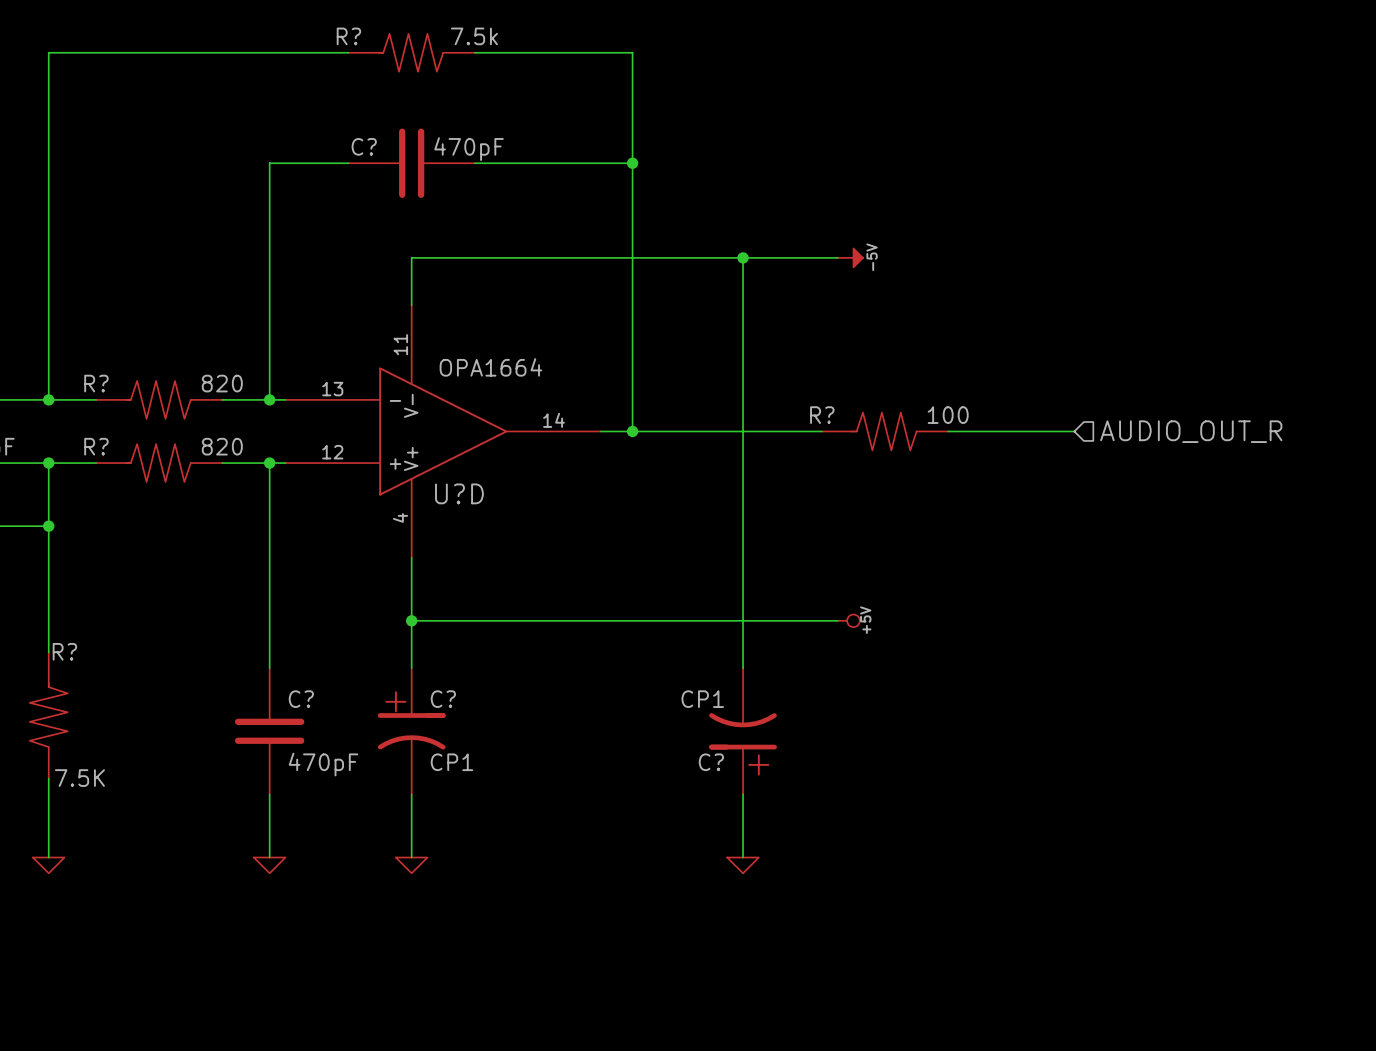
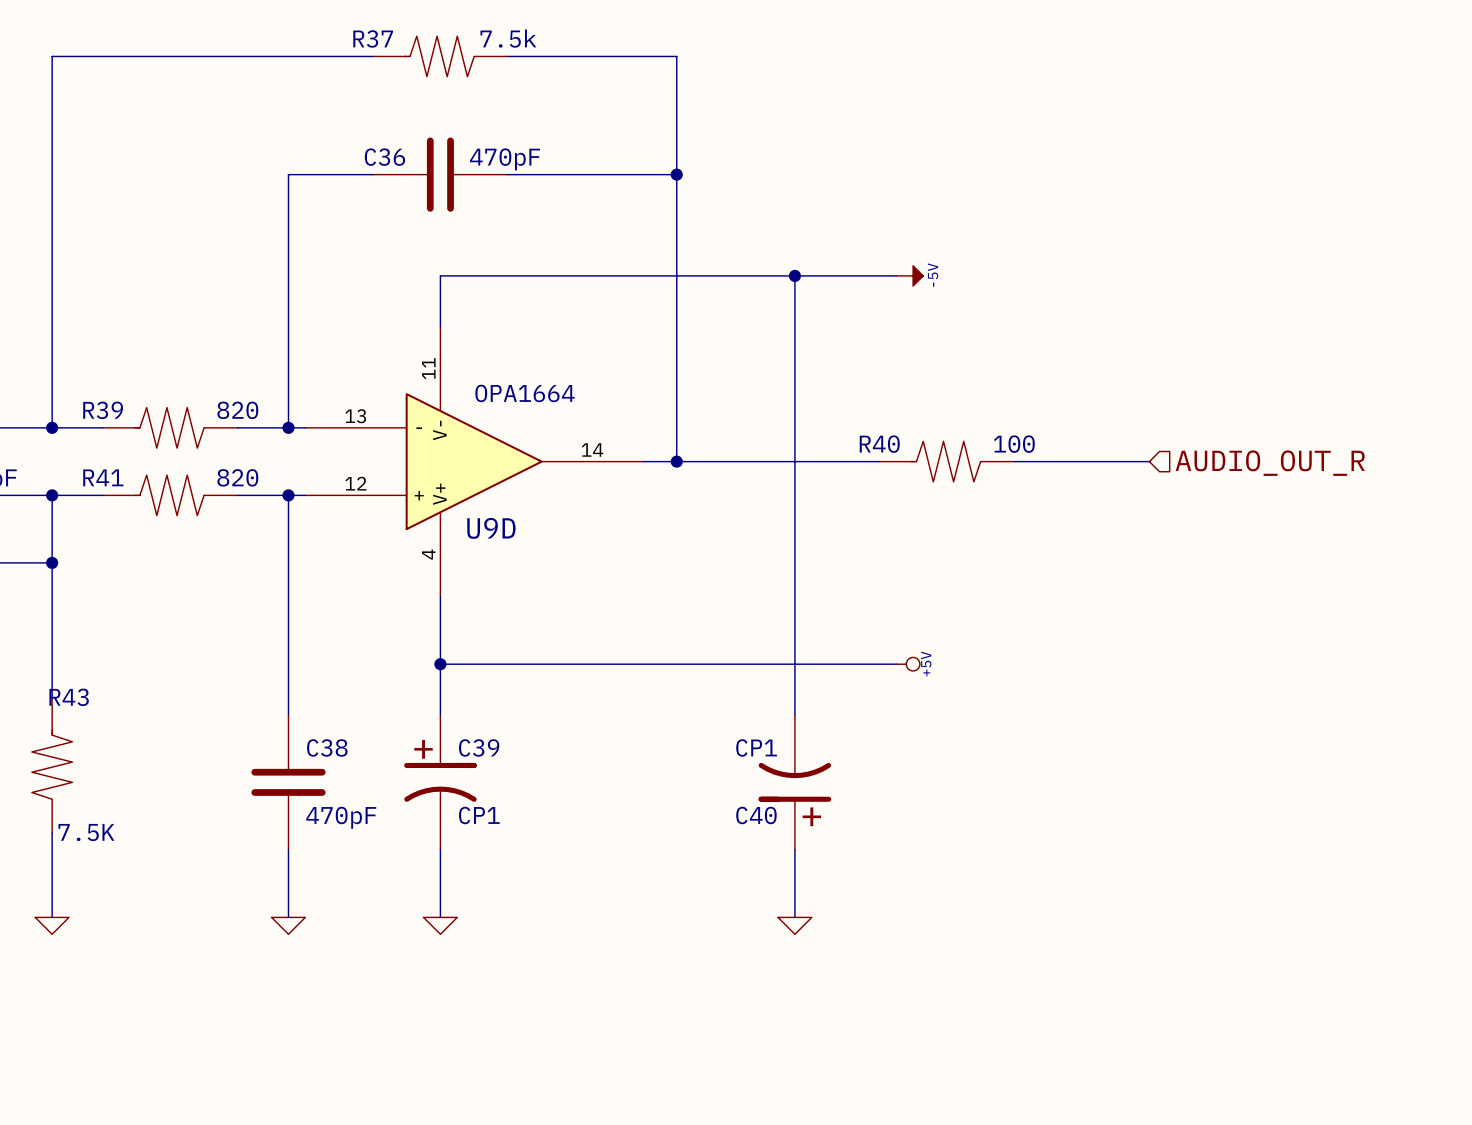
R? name: R? (348, 36) -> R37 (373, 38)
C? name: C? (364, 146) -> C36 (384, 157)
R? name: R? (96, 383) -> R39 (103, 410)
R? name: R? (822, 415) -> R40 (879, 444)
R? name: R? (96, 446) -> R41 (103, 477)
U?D name: U?D (459, 493) -> U9D (491, 528)
R? name: R? (64, 651) -> R43 (69, 697)
C? name: C? (301, 699) -> C38 (327, 747)
C? name: C? (443, 699) -> C39 (479, 747)
C? name: C? (711, 762) -> C40 (756, 815)

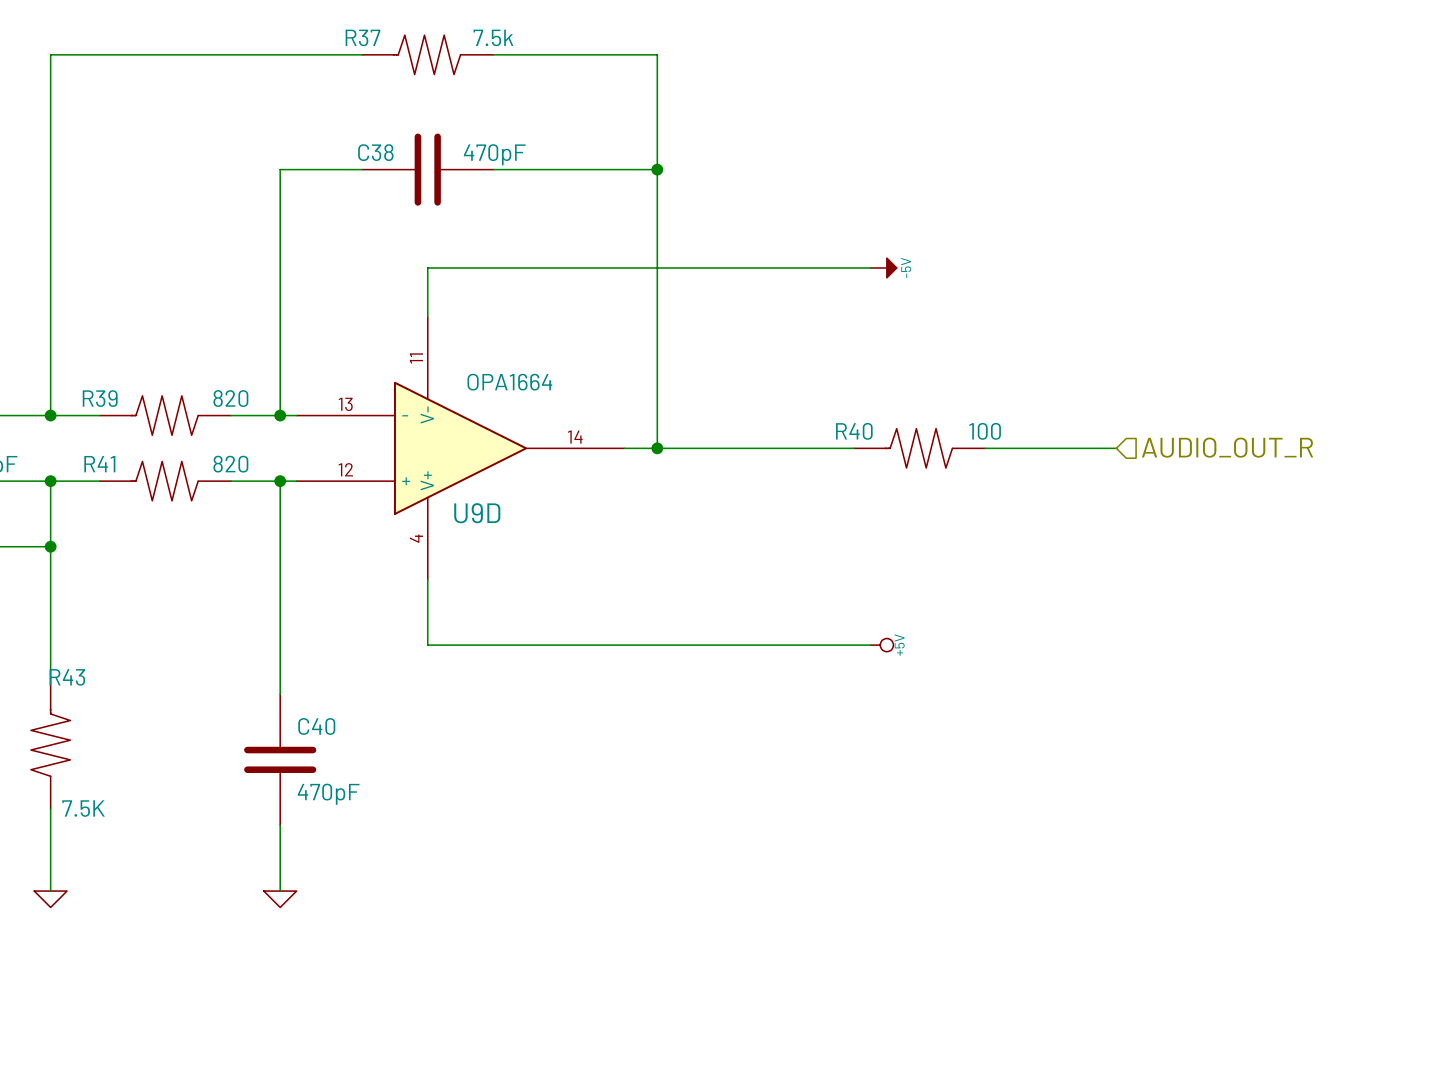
C36 name: C36 (384, 157) -> C38 (375, 152)
wire: (794, 275) (794, 714) -> none
junction: (794, 275) -> none
wire: (440, 664) (440, 714) -> none
junction: (440, 664) -> none
C38 name: C38 (327, 747) -> C40 (316, 726)
C39: CP1 (440, 782) -> none
C40: CP1 (794, 782) -> none
wire: (440, 849) (440, 917) -> none
wire: (794, 849) (794, 917) -> none
power symbol: (440, 925) -> none
power symbol: (794, 925) -> none

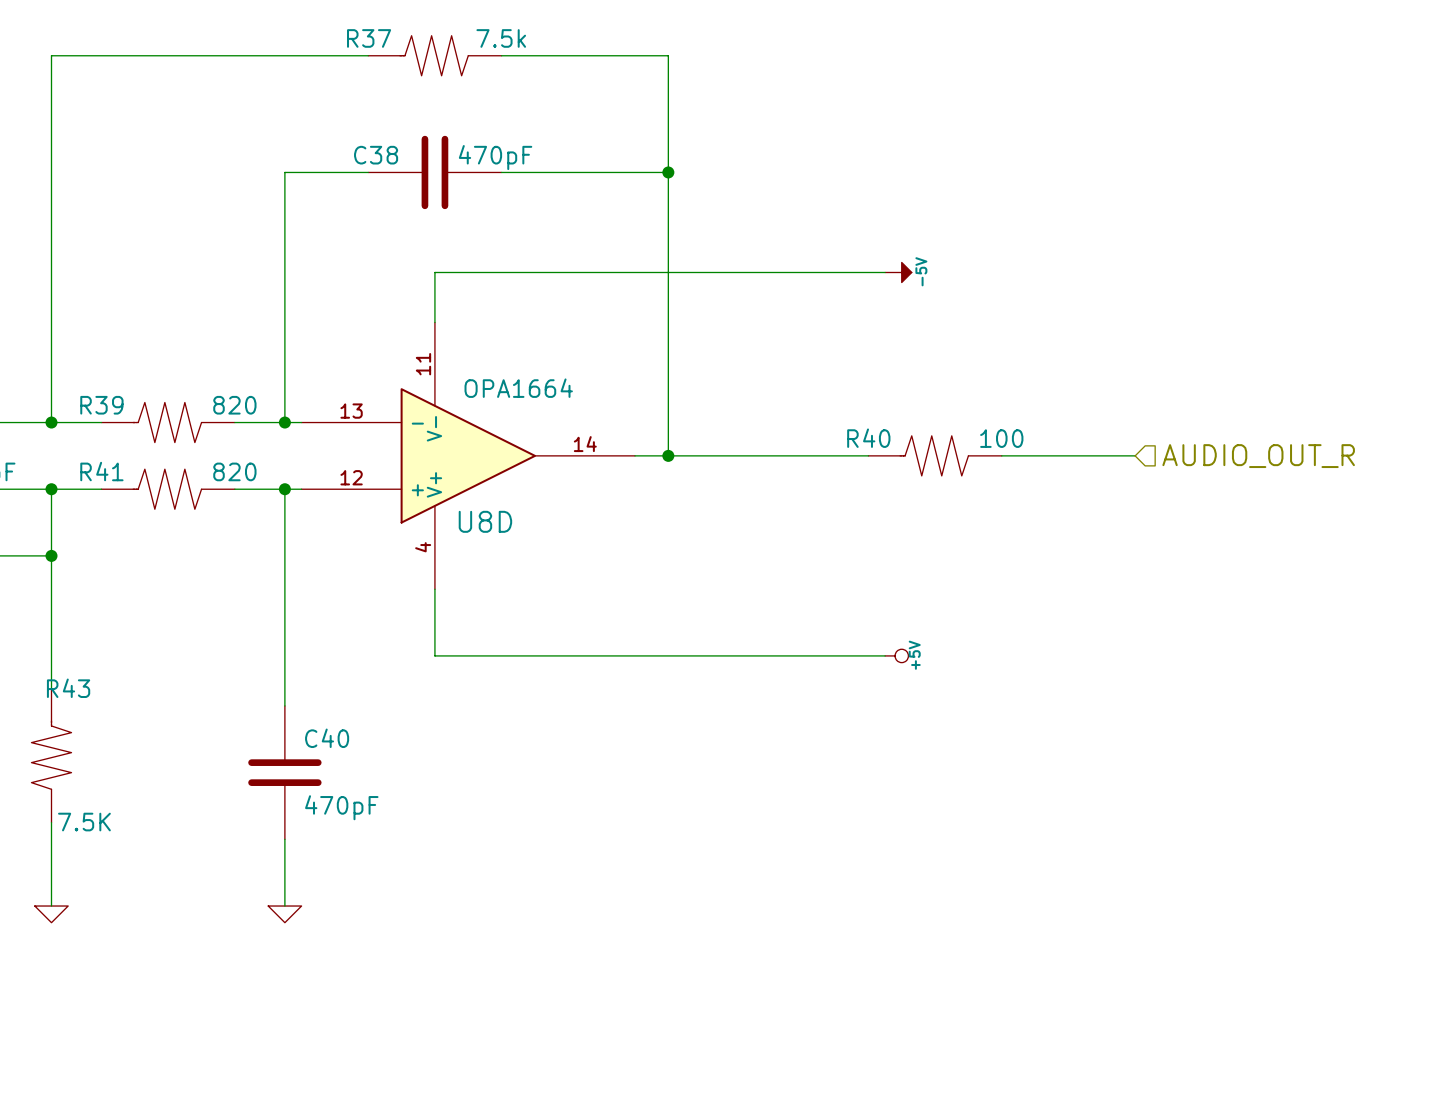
U9D name: U9D (477, 513) -> U8D (485, 521)

